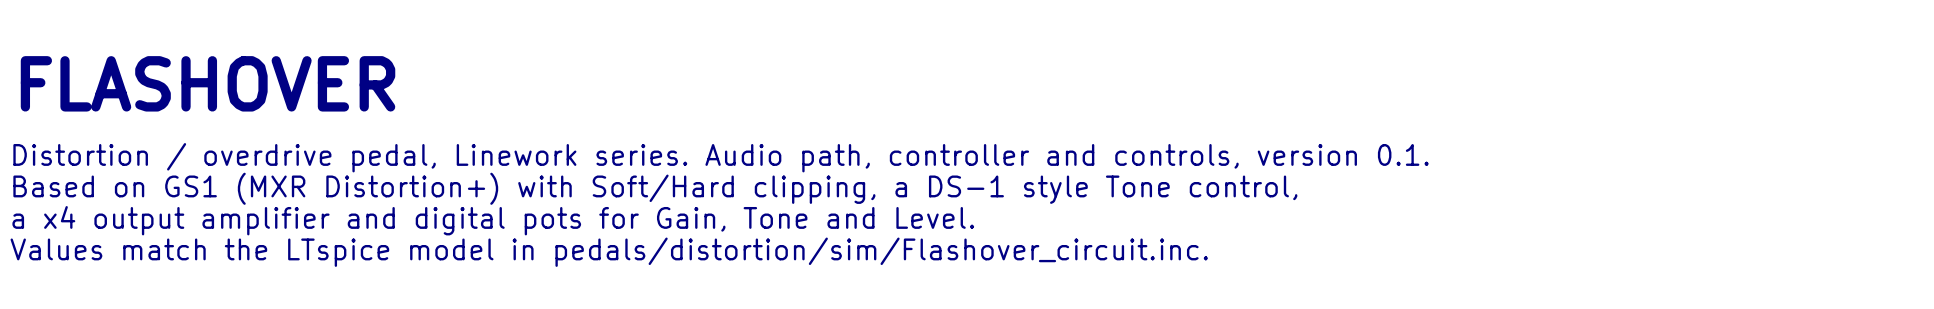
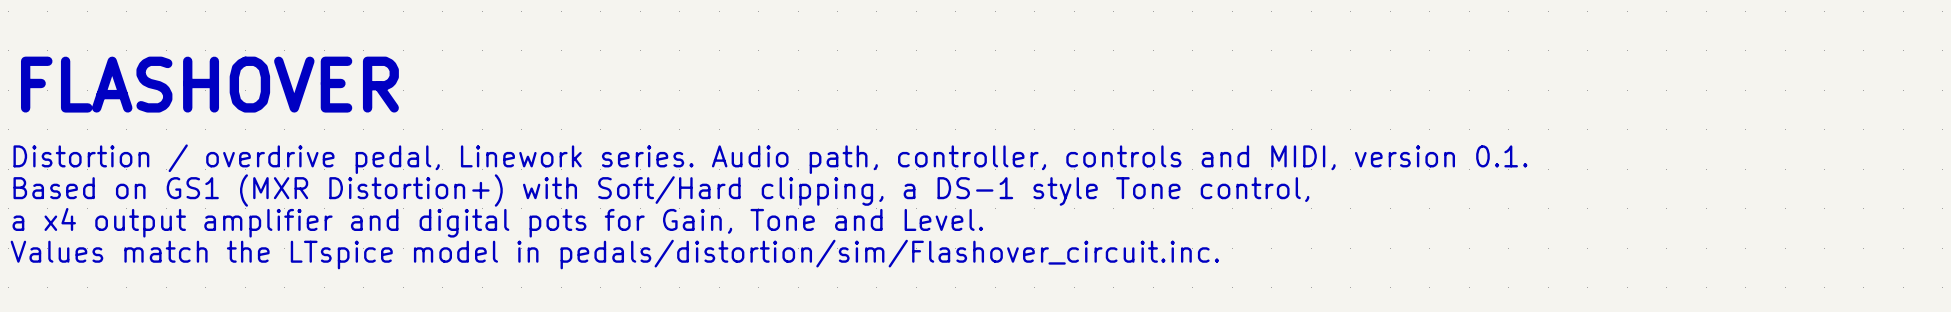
text: Distortion / overdrive pedal, Linework series. Audio path, controller and controls, version 0.1. (721, 157) -> Distortion / overdrive pedal, Linework series. Audio path, controller, controls and MIDI, version 0.1. (770, 159)

